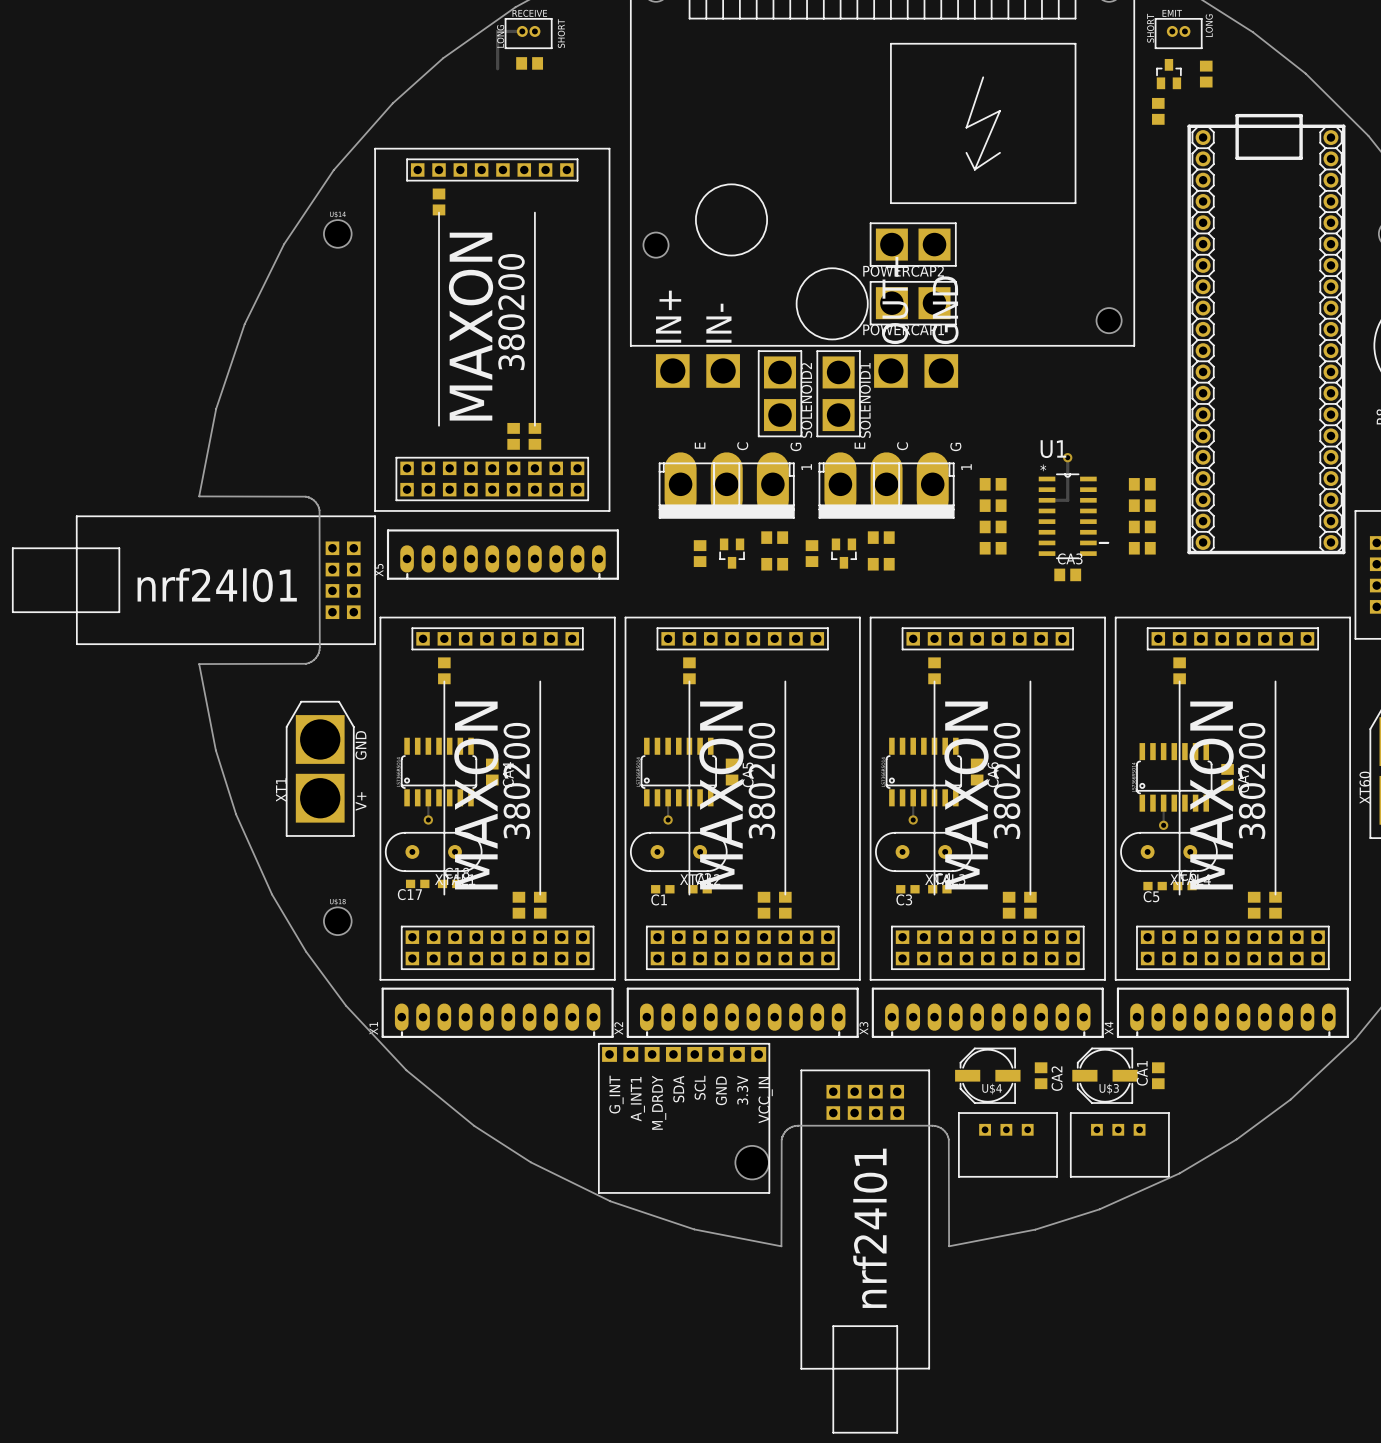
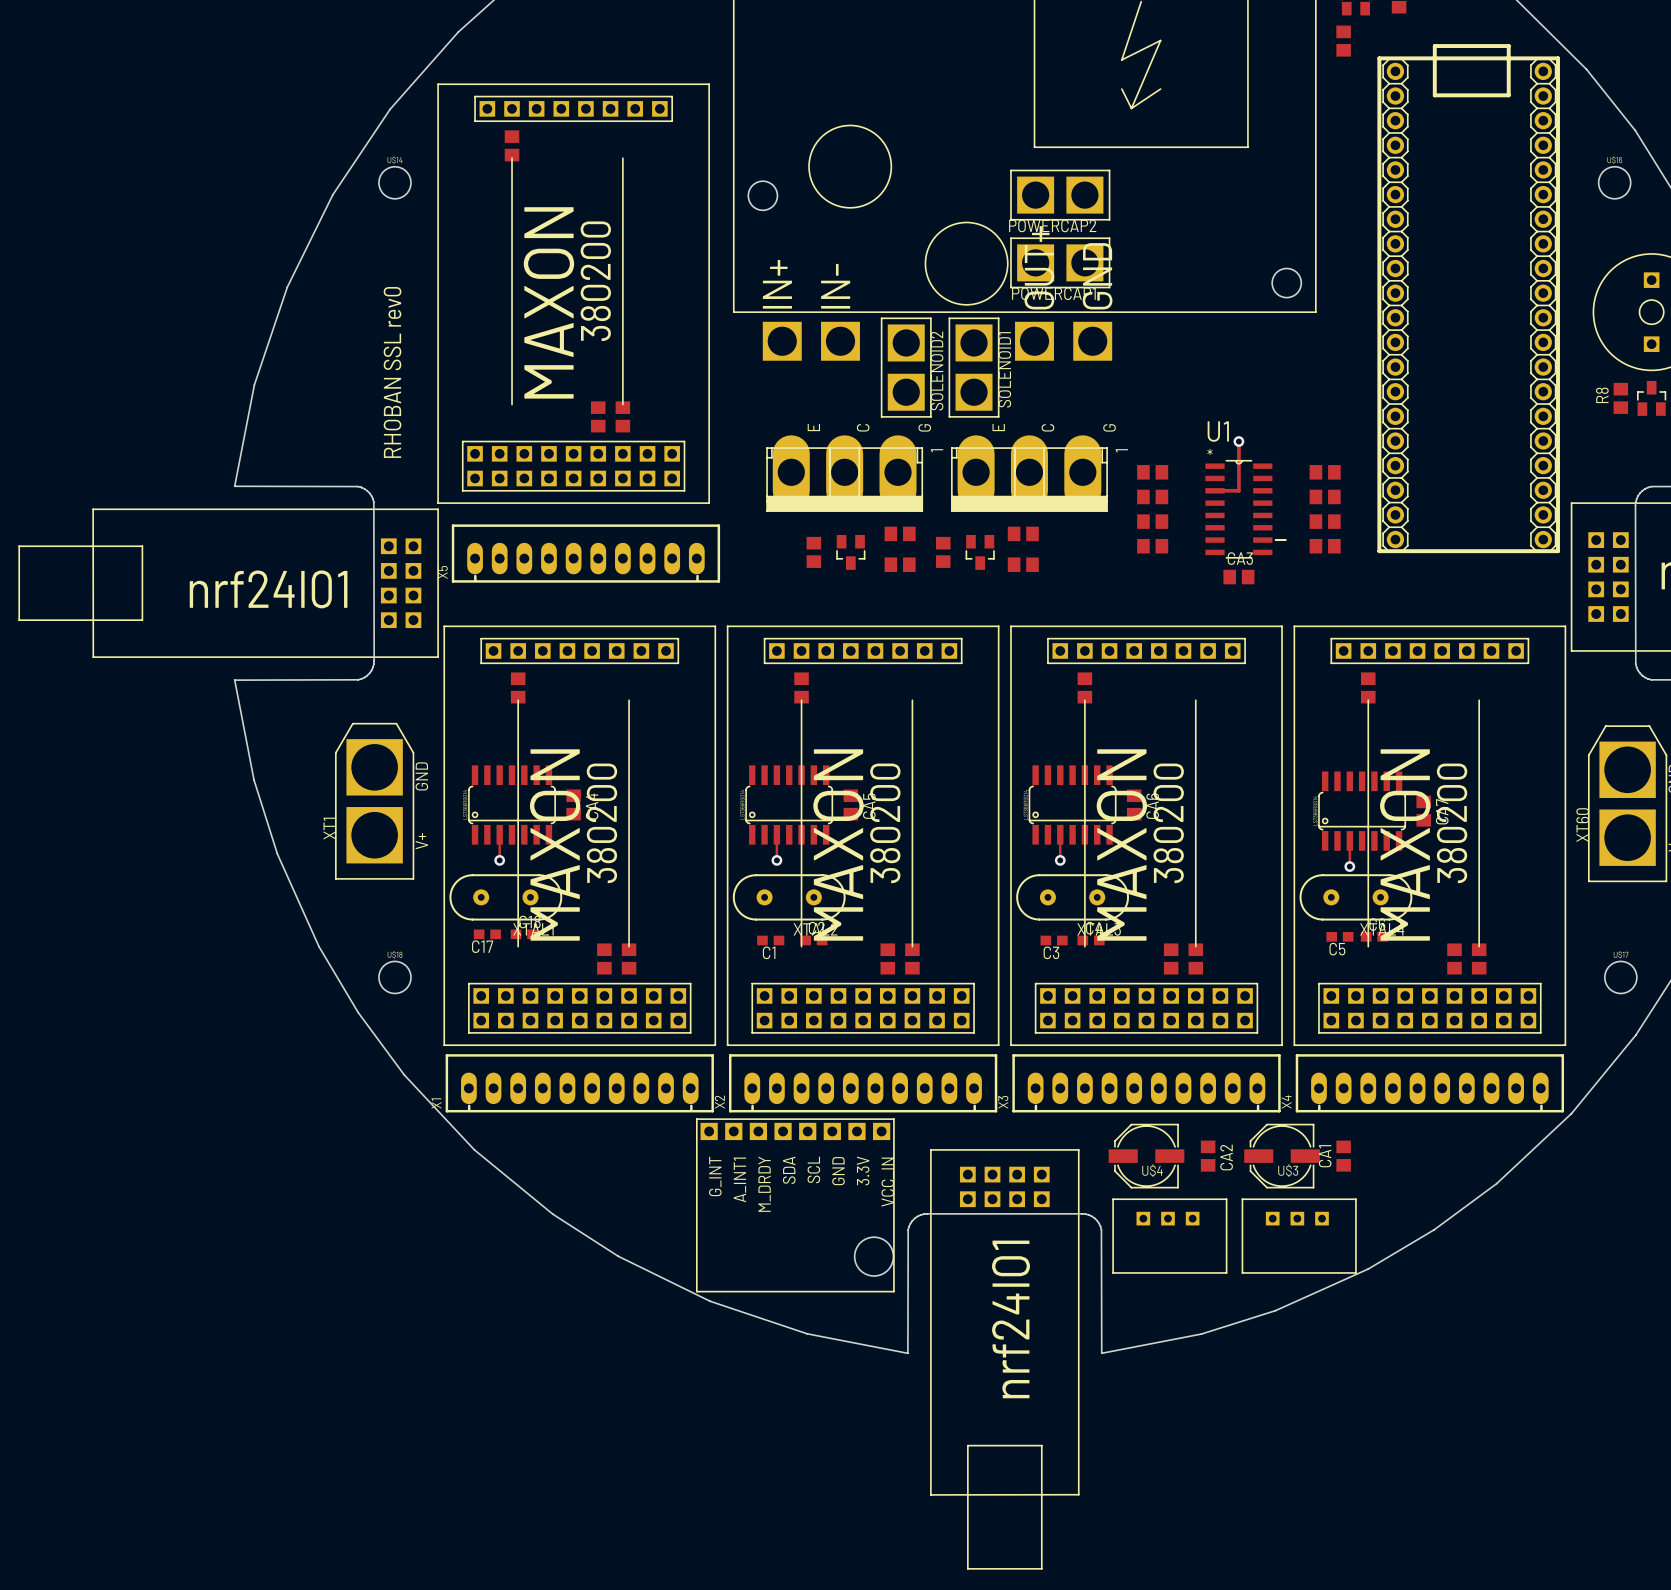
text: none -> RHOBAN SSL rev0 (392, 372)

